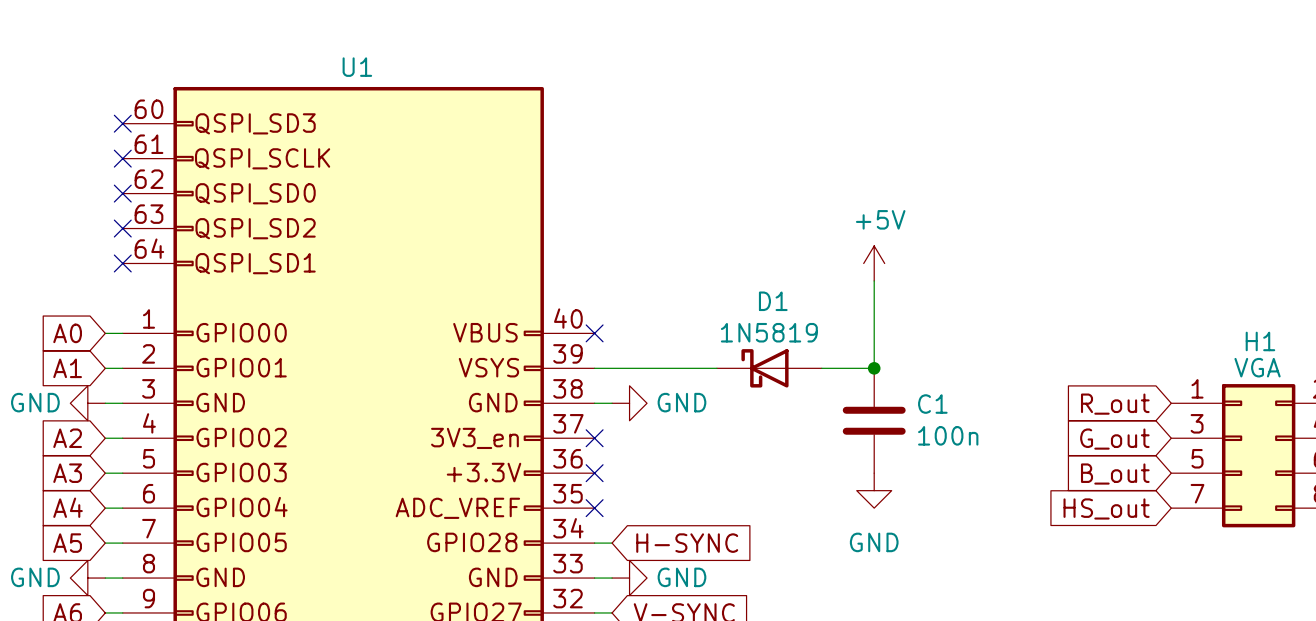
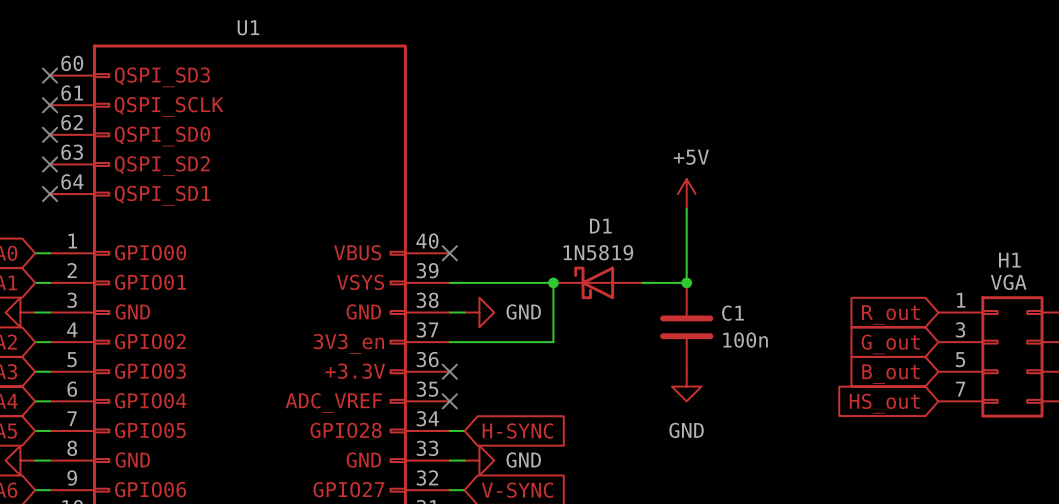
wire: none -> (553, 282) (553, 342) (449, 342)
junction: none -> (553, 282)
no-connect mark: (594, 438) -> none

